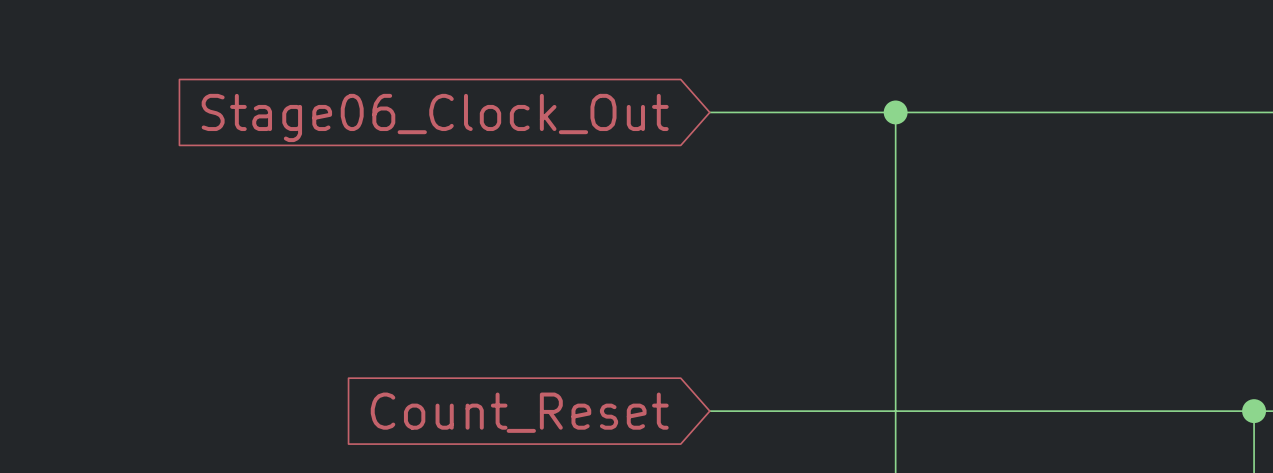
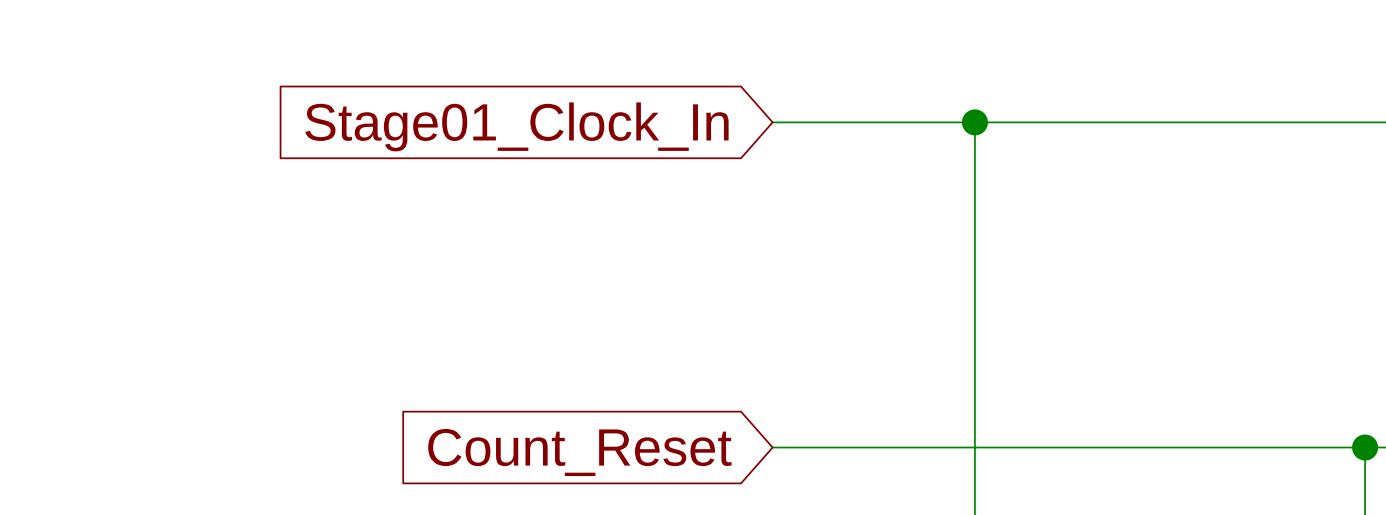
global label: Stage06_Clock_Out (435, 117) -> Stage01_Clock_In (516, 126)

